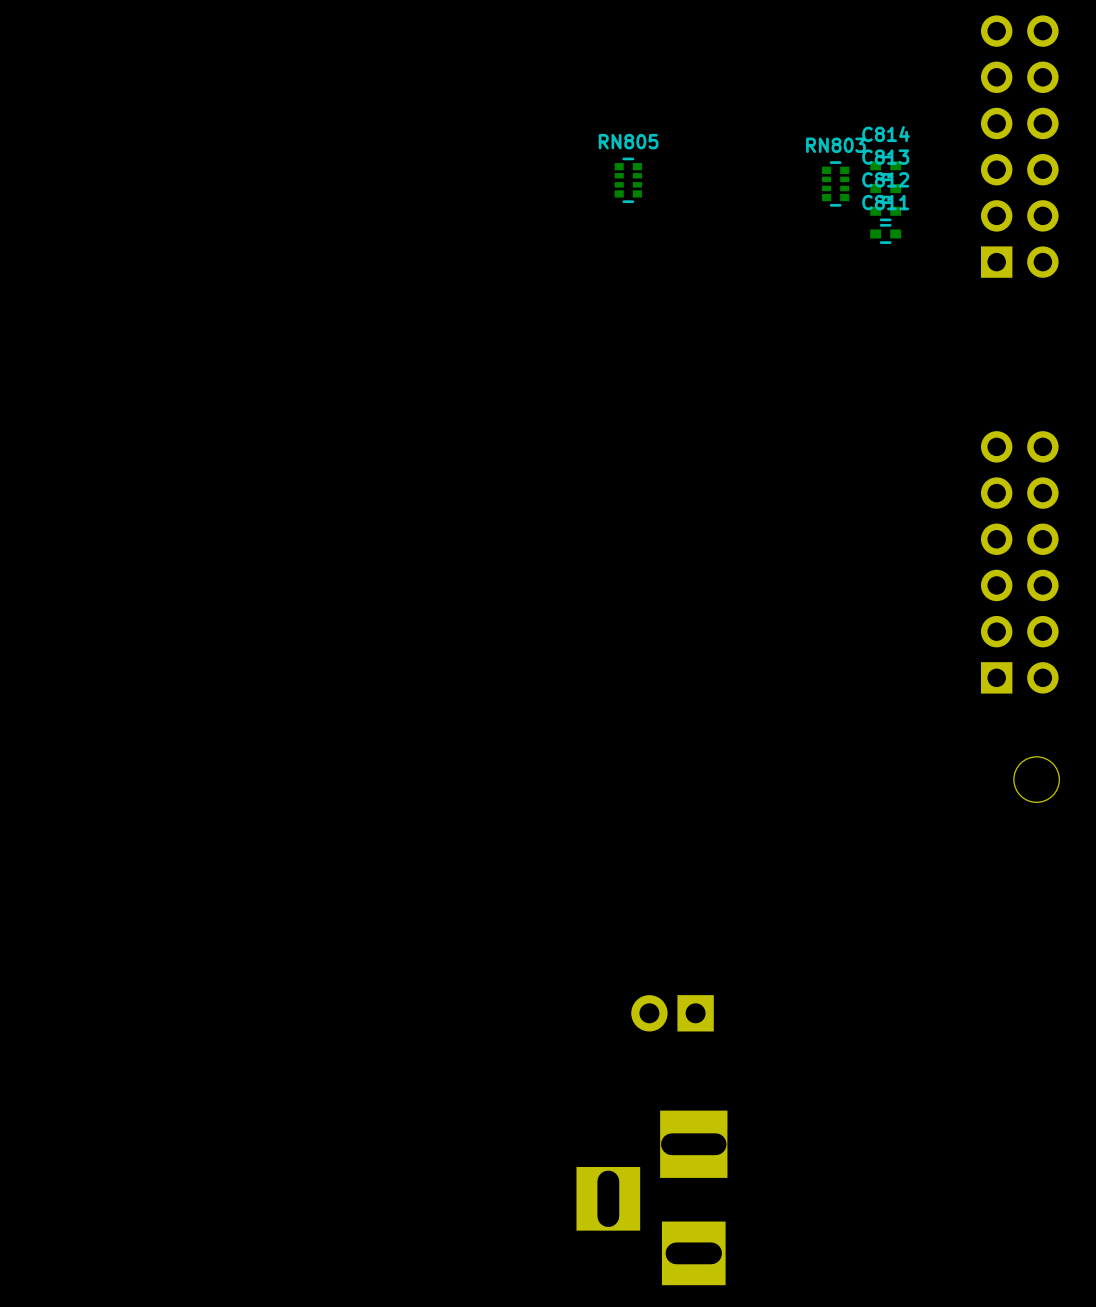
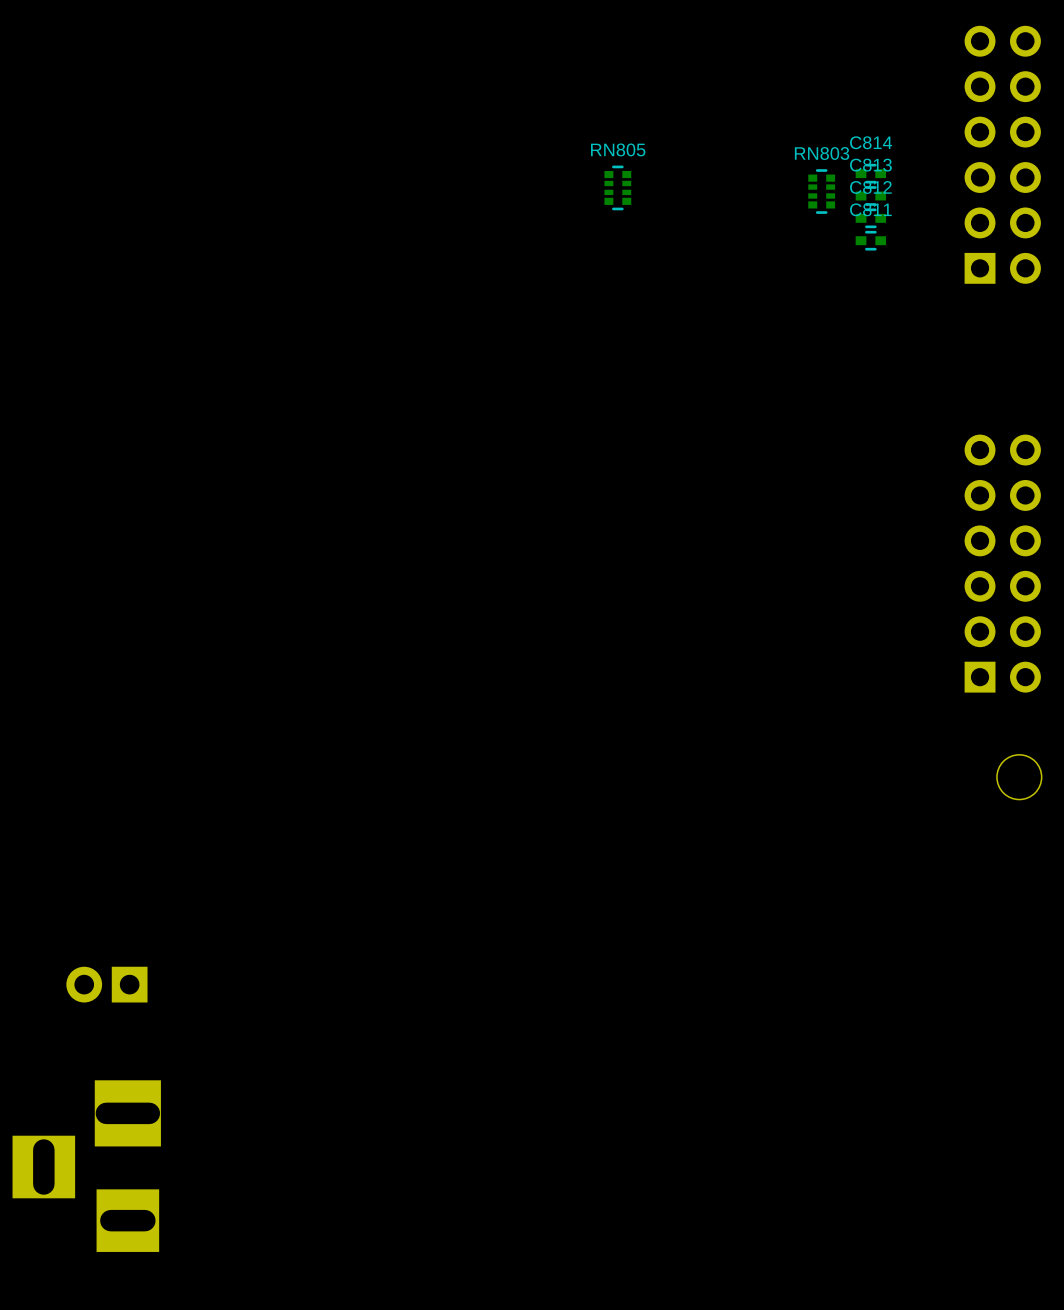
part: none -> (106, 984)
part: (672, 1013) -> none
part: none -> (86, 1166)
part: (651, 1197) -> none

